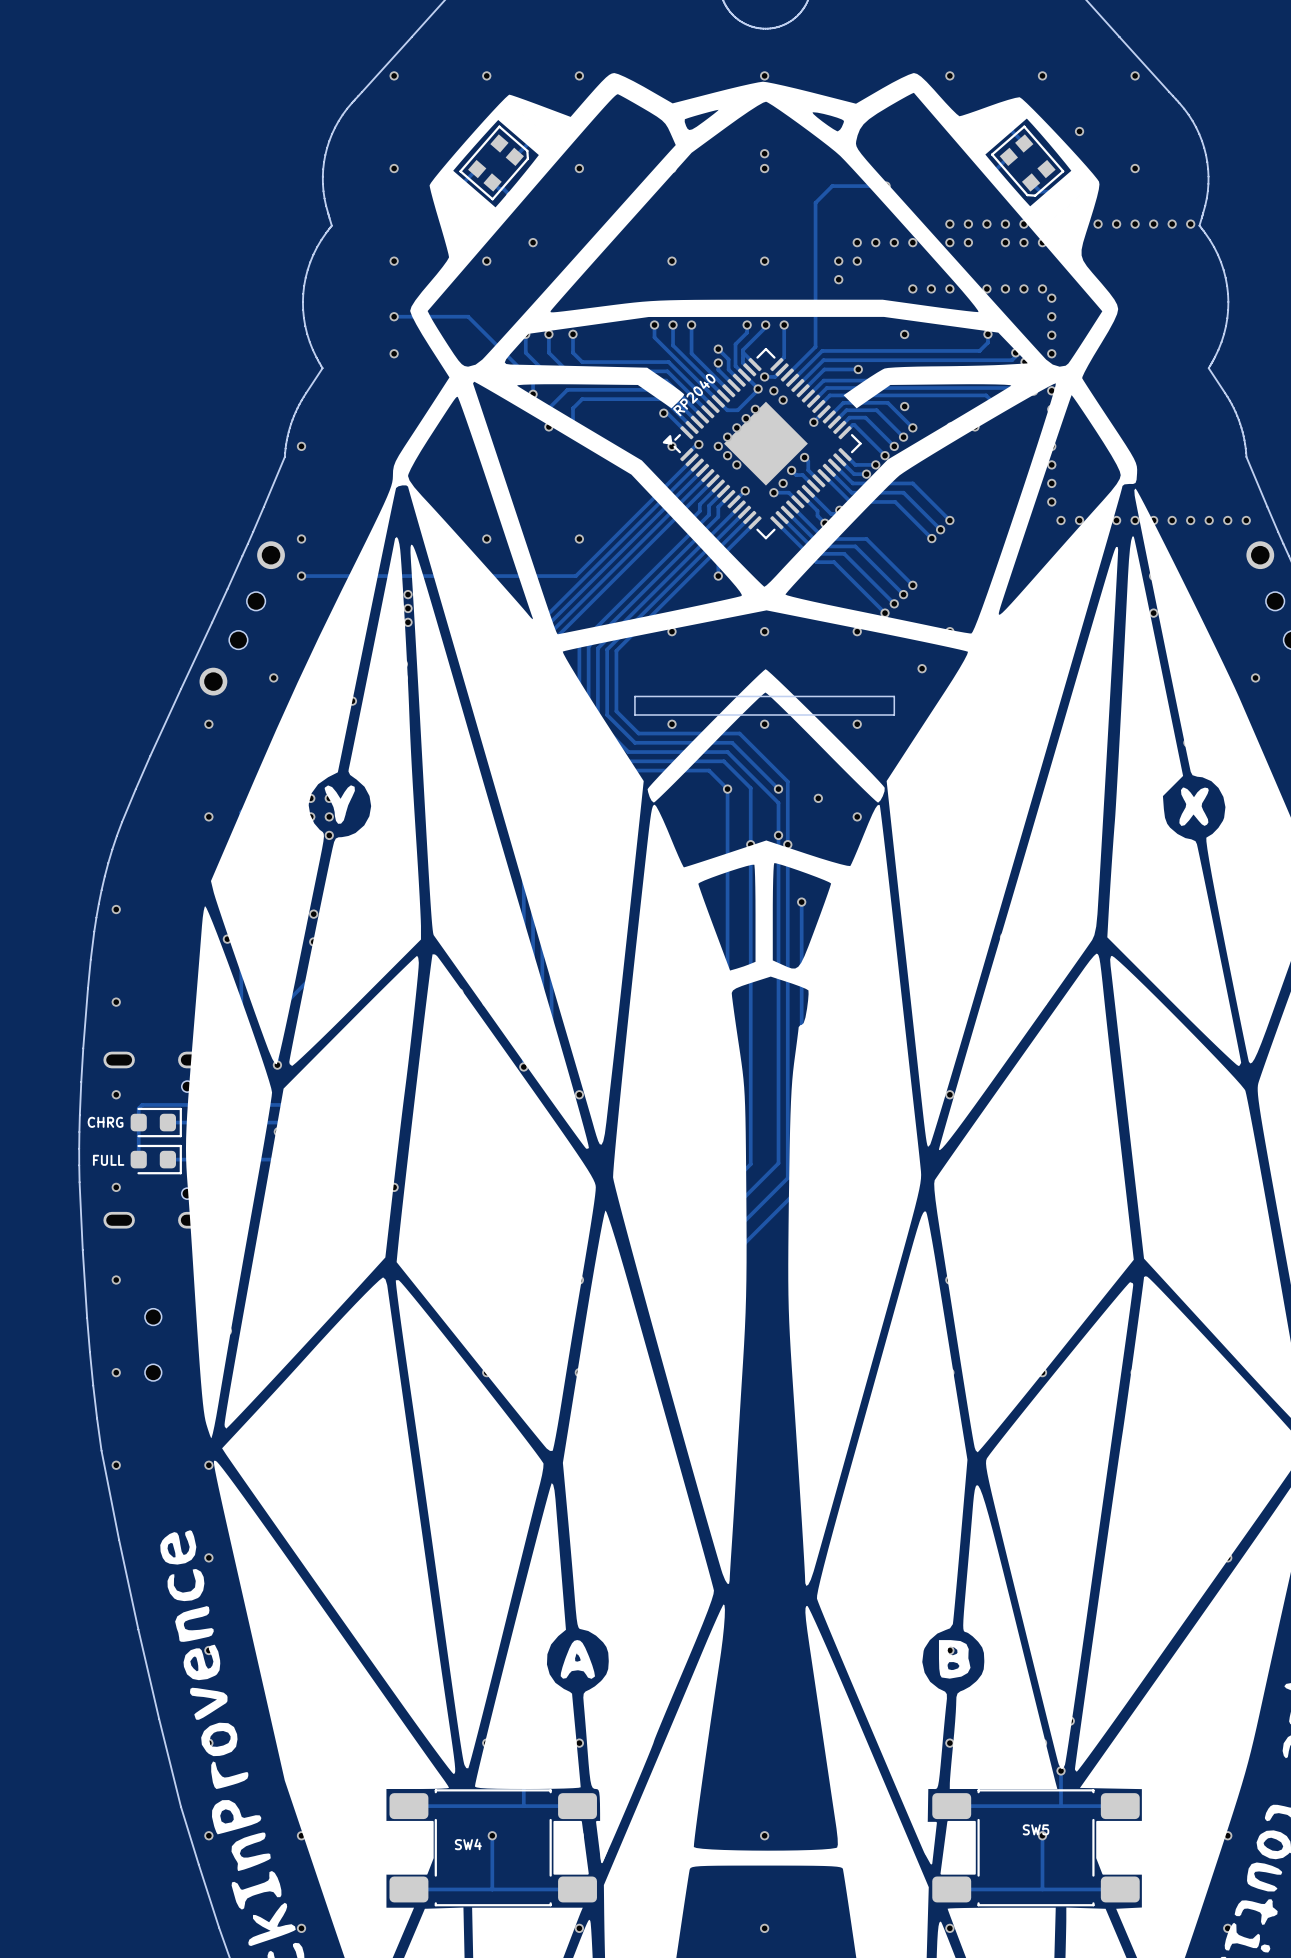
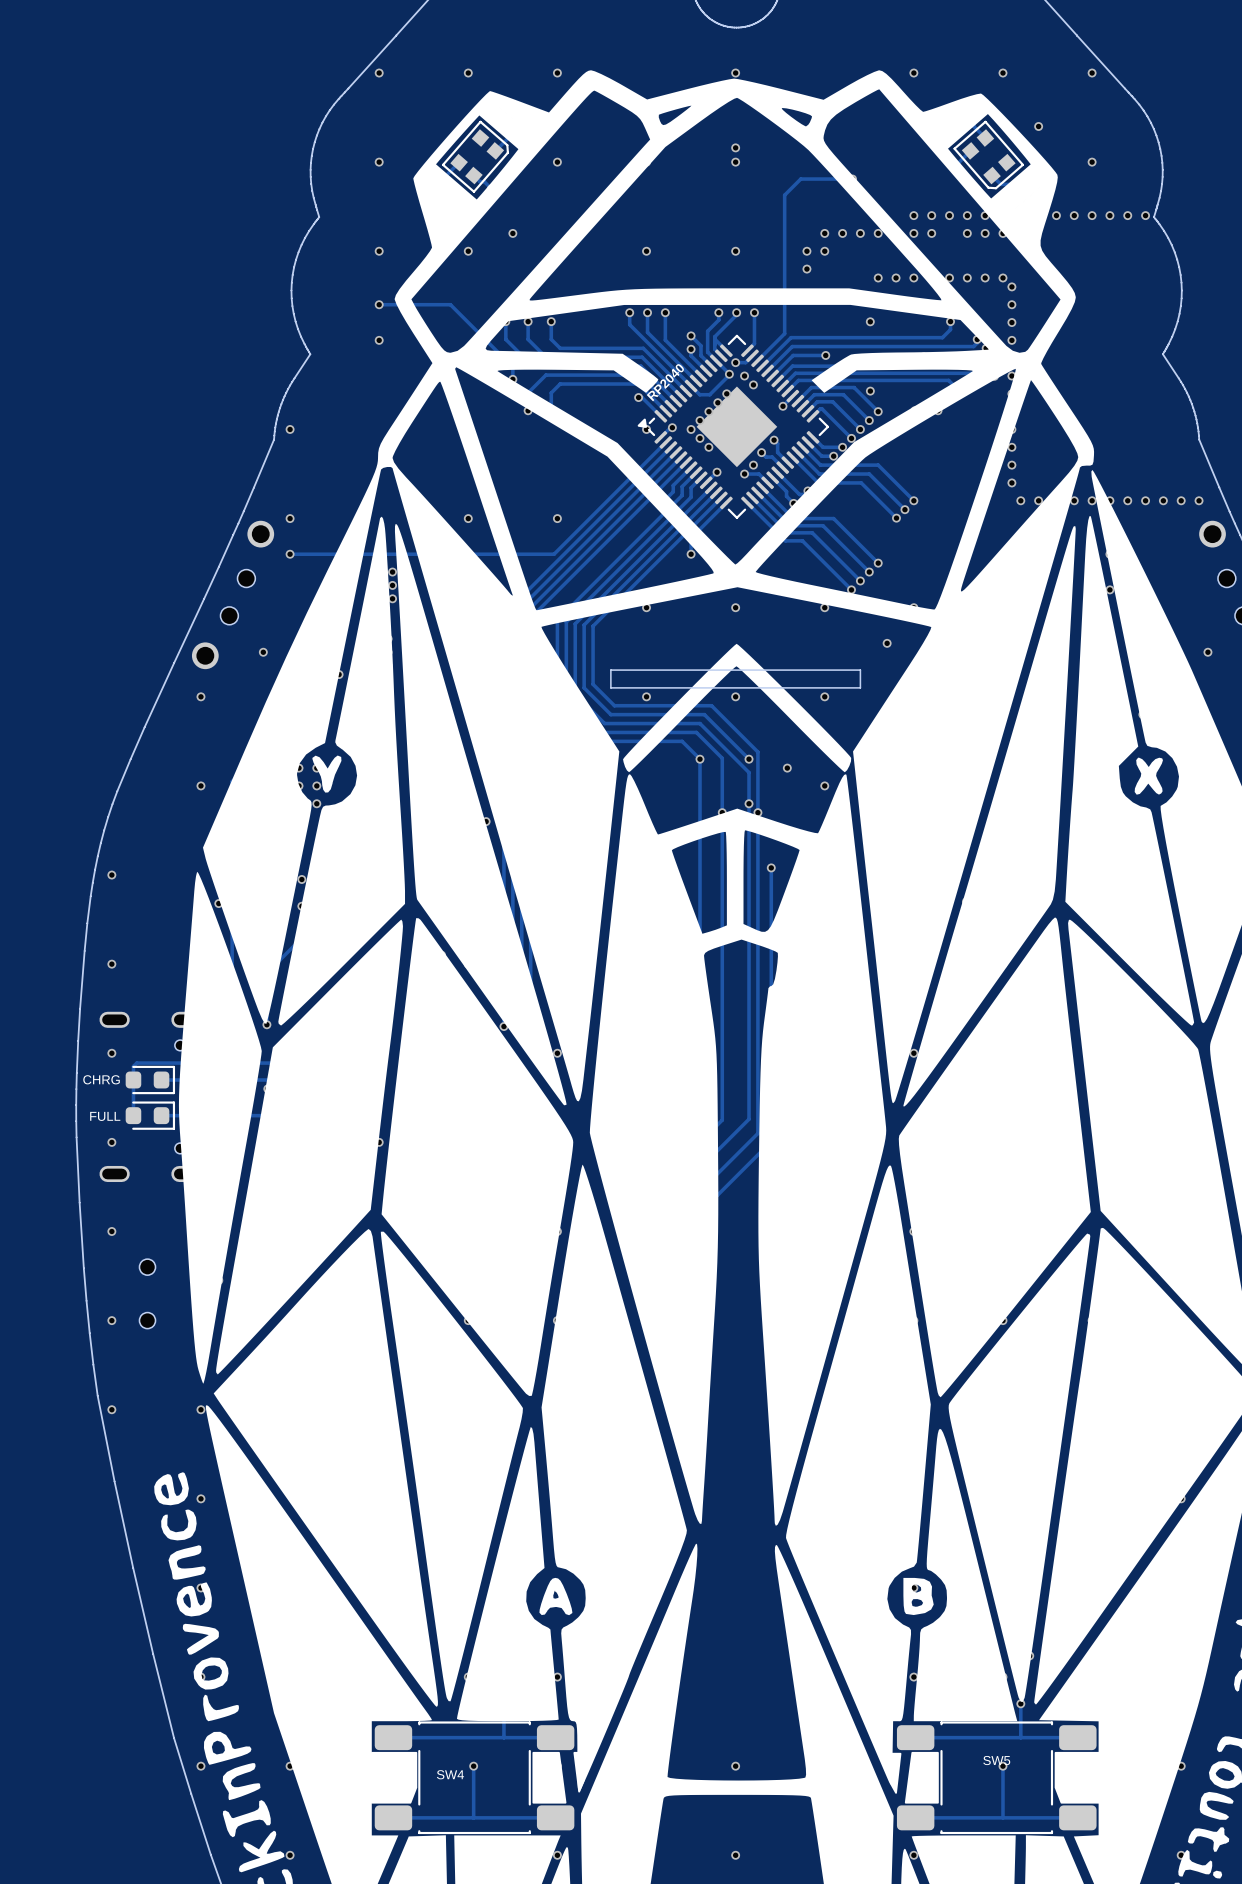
via: none -> (486, 821)

